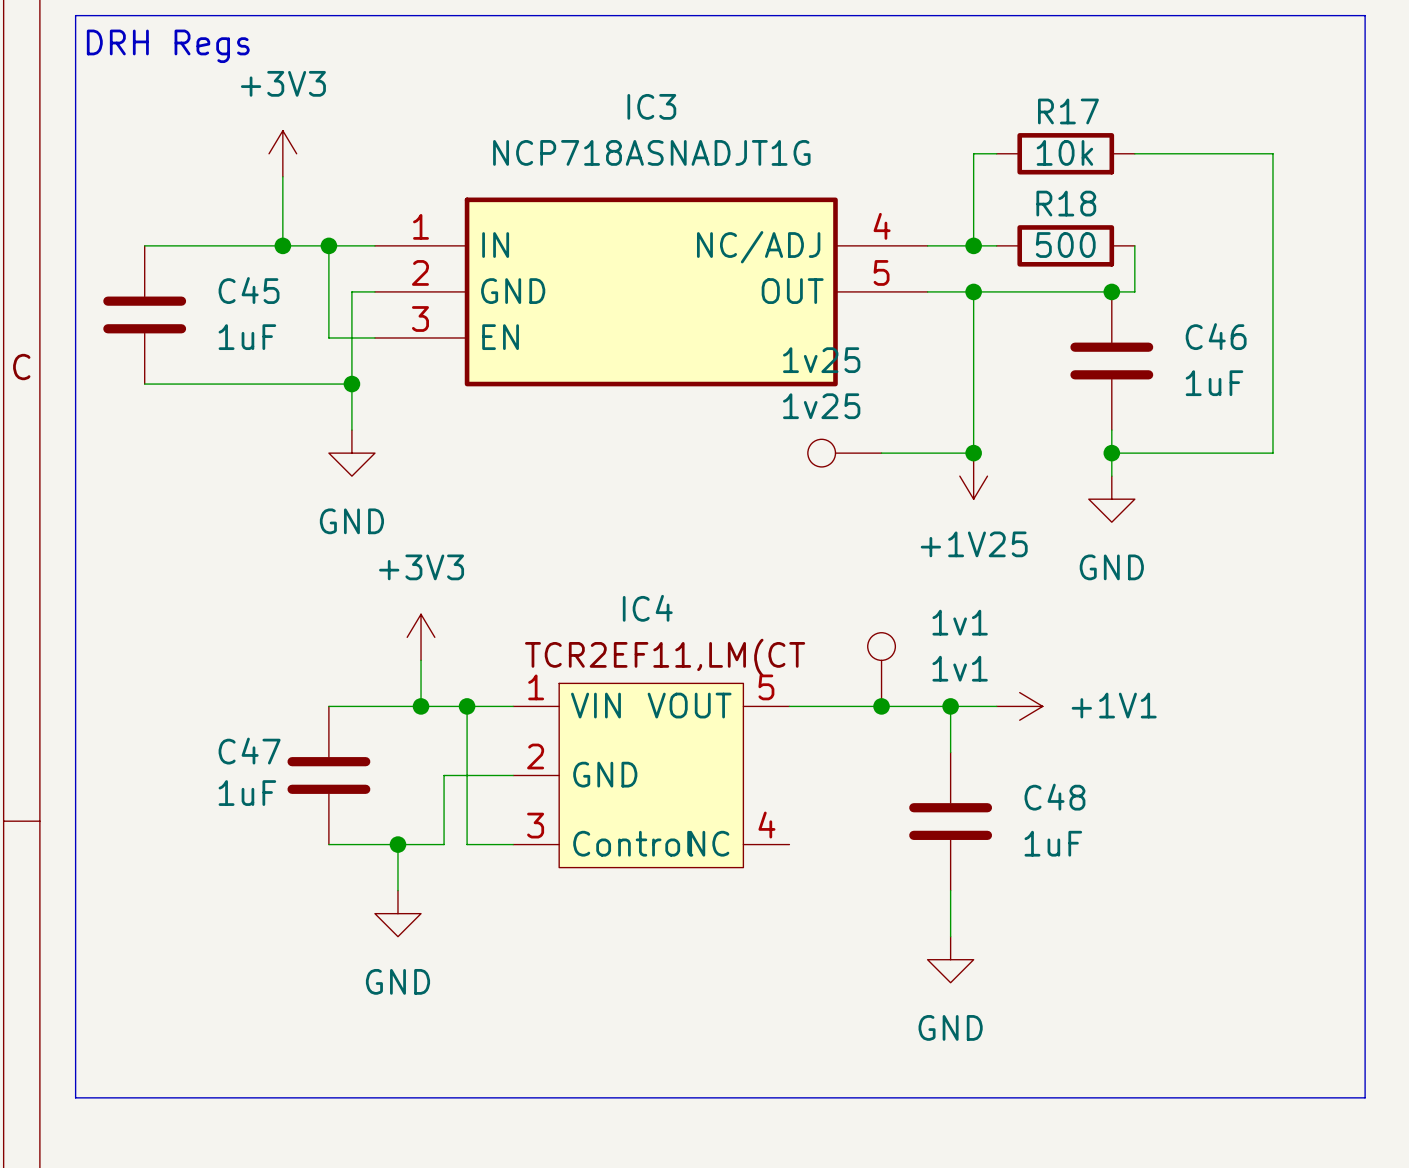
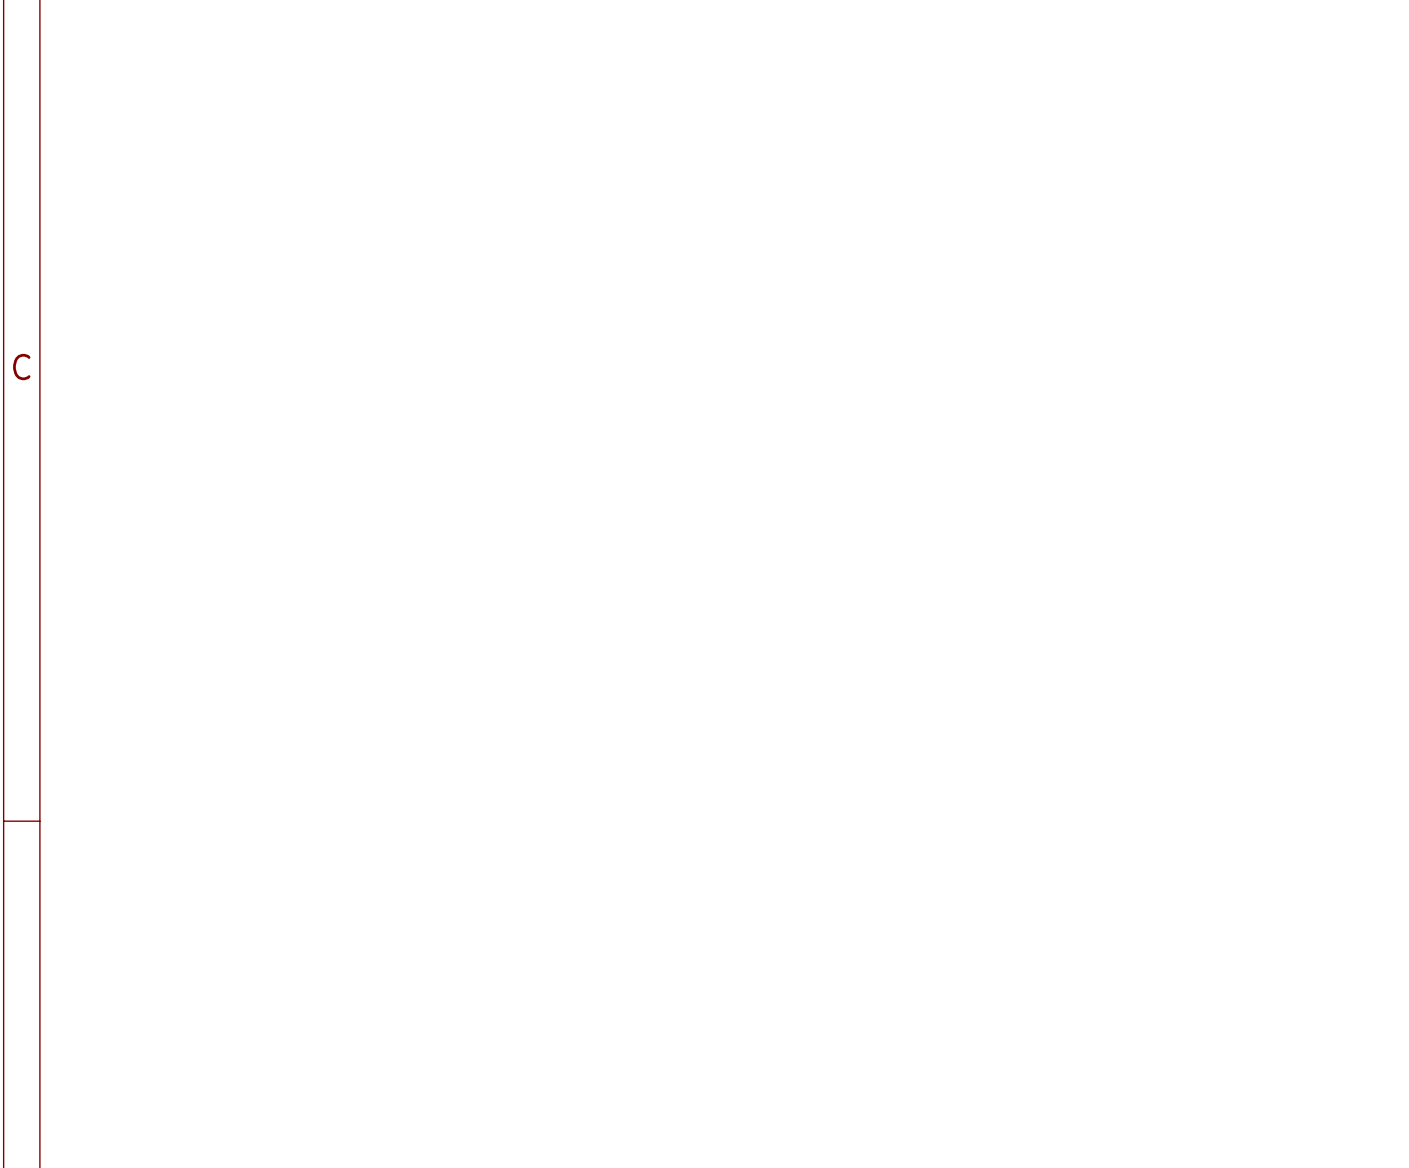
line: (75, 15) (1365, 15) (1365, 1097) (75, 1097) (75, 15) -> none
text: DRH Regs (168, 46) -> none
power symbol: +3V3 (282, 153) -> none
wire: (996, 153) (973, 153) (973, 245) -> none
R17: 10k (1065, 153) -> none
wire: (1134, 153) (1272, 153) (1272, 453) (1111, 453) -> none
wire: (282, 176) (282, 245) -> none
wire: (144, 245) (374, 245) -> none
junction: (282, 245) -> none
wire: (328, 245) (328, 337) (374, 337) -> none
junction: (328, 245) -> none
wire: (927, 245) (996, 245) -> none
junction: (973, 245) -> none
R18: 500 (1065, 245) -> none
wire: (1134, 245) (1134, 291) (927, 291) -> none
wire: (374, 291) (351, 291) (351, 430) -> none
IC3: NCP718ASNADJT1G (651, 291) -> none
wire: (973, 291) (973, 453) (881, 453) -> none
junction: (973, 291) -> none
junction: (1111, 291) -> none
C45: 1uF (144, 314) -> none
C46: 1uF (1111, 361) -> none
wire: (144, 384) (351, 384) -> none
junction: (351, 384) -> none
wire: (1111, 430) (1111, 476) -> none
power symbol: GND (351, 453) -> none
1v25: 1v25 (844, 453) -> none
junction: (973, 453) -> none
junction: (1111, 453) -> none
power symbol: +1V25 (973, 476) -> none
power symbol: GND (1111, 499) -> none
power symbol: +3V3 (421, 637) -> none
wire: (421, 660) (421, 706) -> none
1v1: 1v1 (881, 669) -> none
wire: (328, 706) (513, 706) -> none
junction: (421, 706) -> none
wire: (467, 706) (467, 844) (513, 844) -> none
junction: (467, 706) -> none
wire: (789, 706) (996, 706) -> none
junction: (881, 706) -> none
wire: (950, 706) (950, 752) -> none
junction: (950, 706) -> none
power symbol: +1V1 (1019, 706) -> none
C47: 1uF (328, 775) -> none
wire: (513, 775) (444, 775) (444, 844) (328, 844) -> none
IC4: (651, 775) -> none
C48: 1uF (950, 821) -> none
wire: (397, 844) (397, 890) -> none
junction: (397, 844) -> none
wire: (950, 890) (950, 936) -> none
power symbol: GND (397, 913) -> none
power symbol: GND (950, 959) -> none

